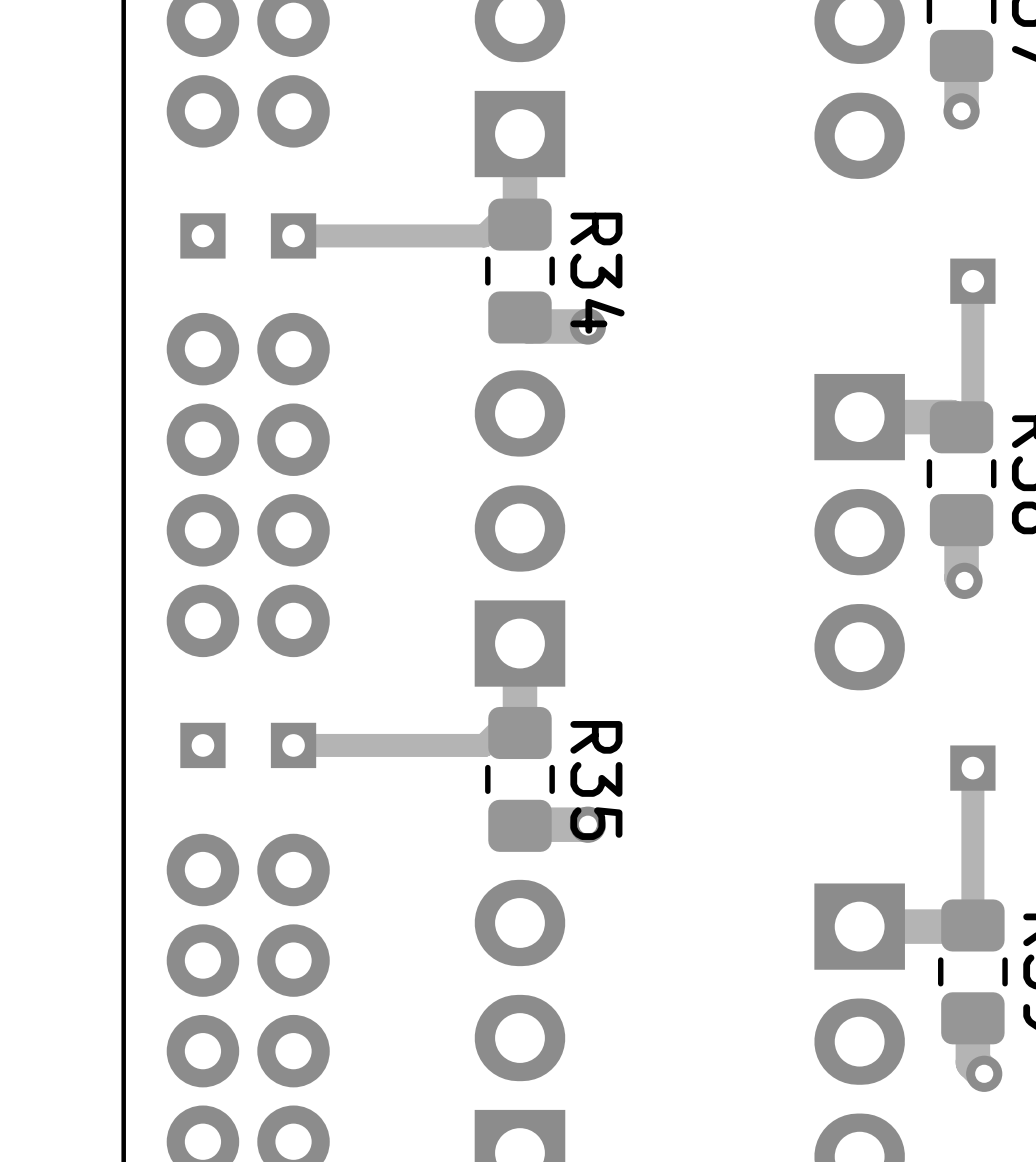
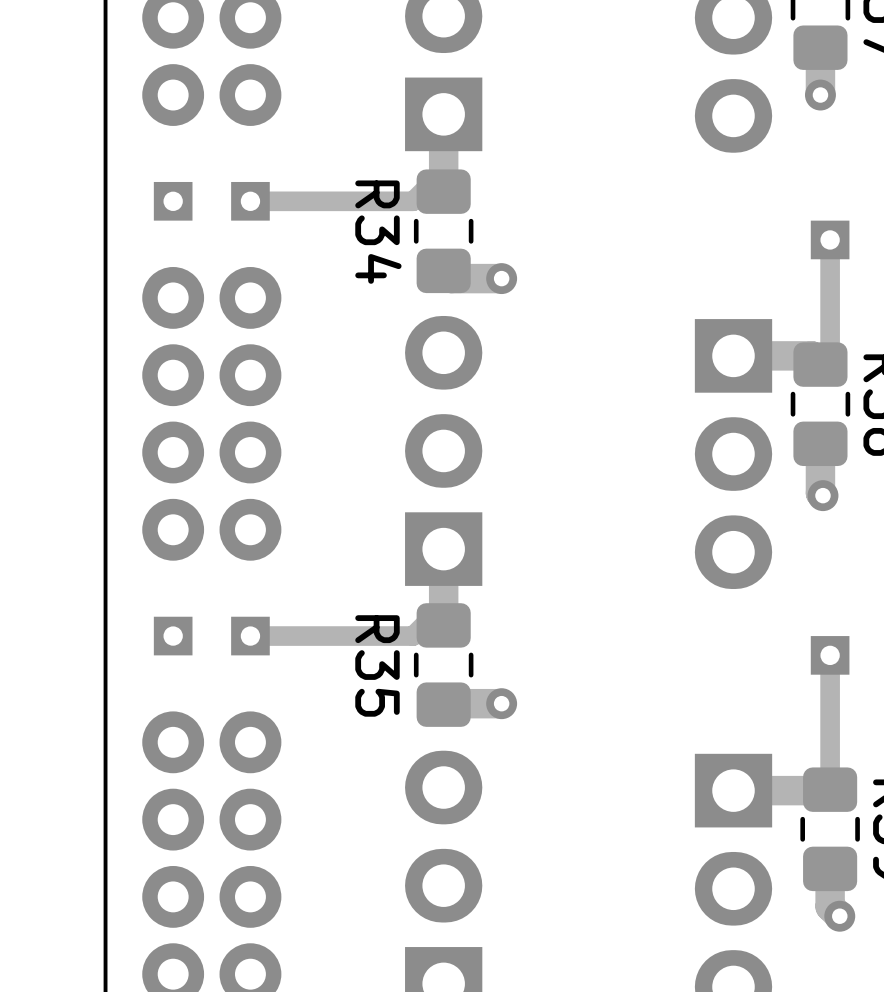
R34 name position: R34 (597, 273) -> R34 (378, 232)
R35 name position: R35 (596, 780) -> R35 (377, 665)

